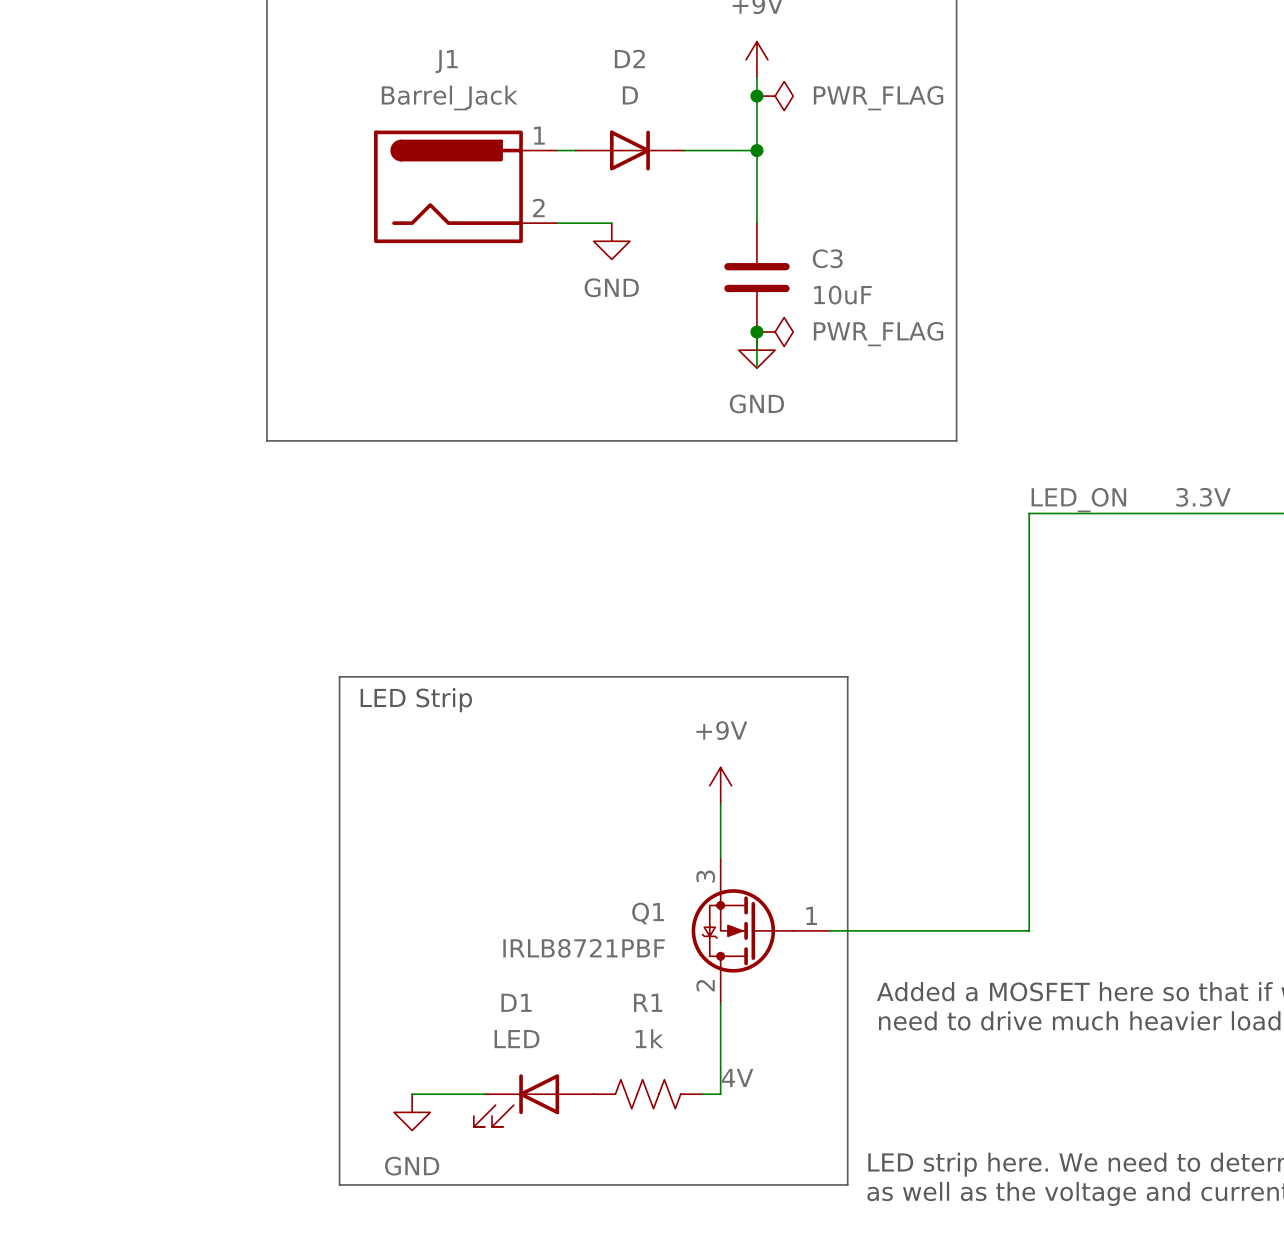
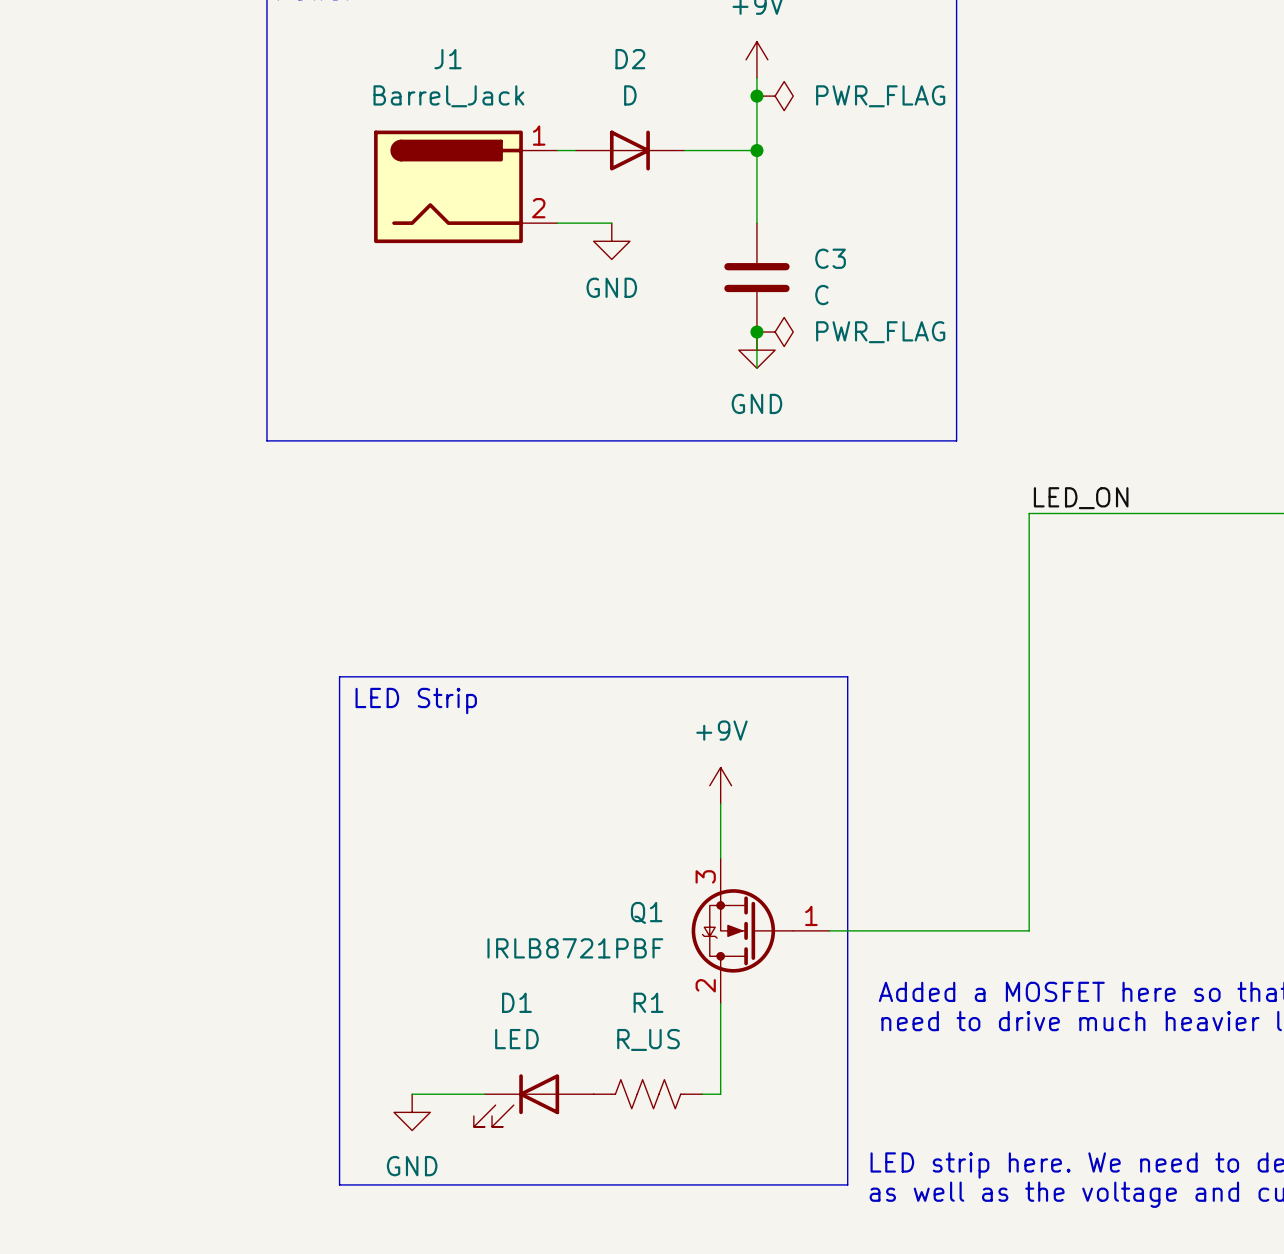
C3 value: 10uF (842, 295) -> C (821, 295)
label: 3.3V (1203, 497) -> none
R1 value: 1k (649, 1038) -> R_US (648, 1039)
label: 4V (737, 1078) -> none

